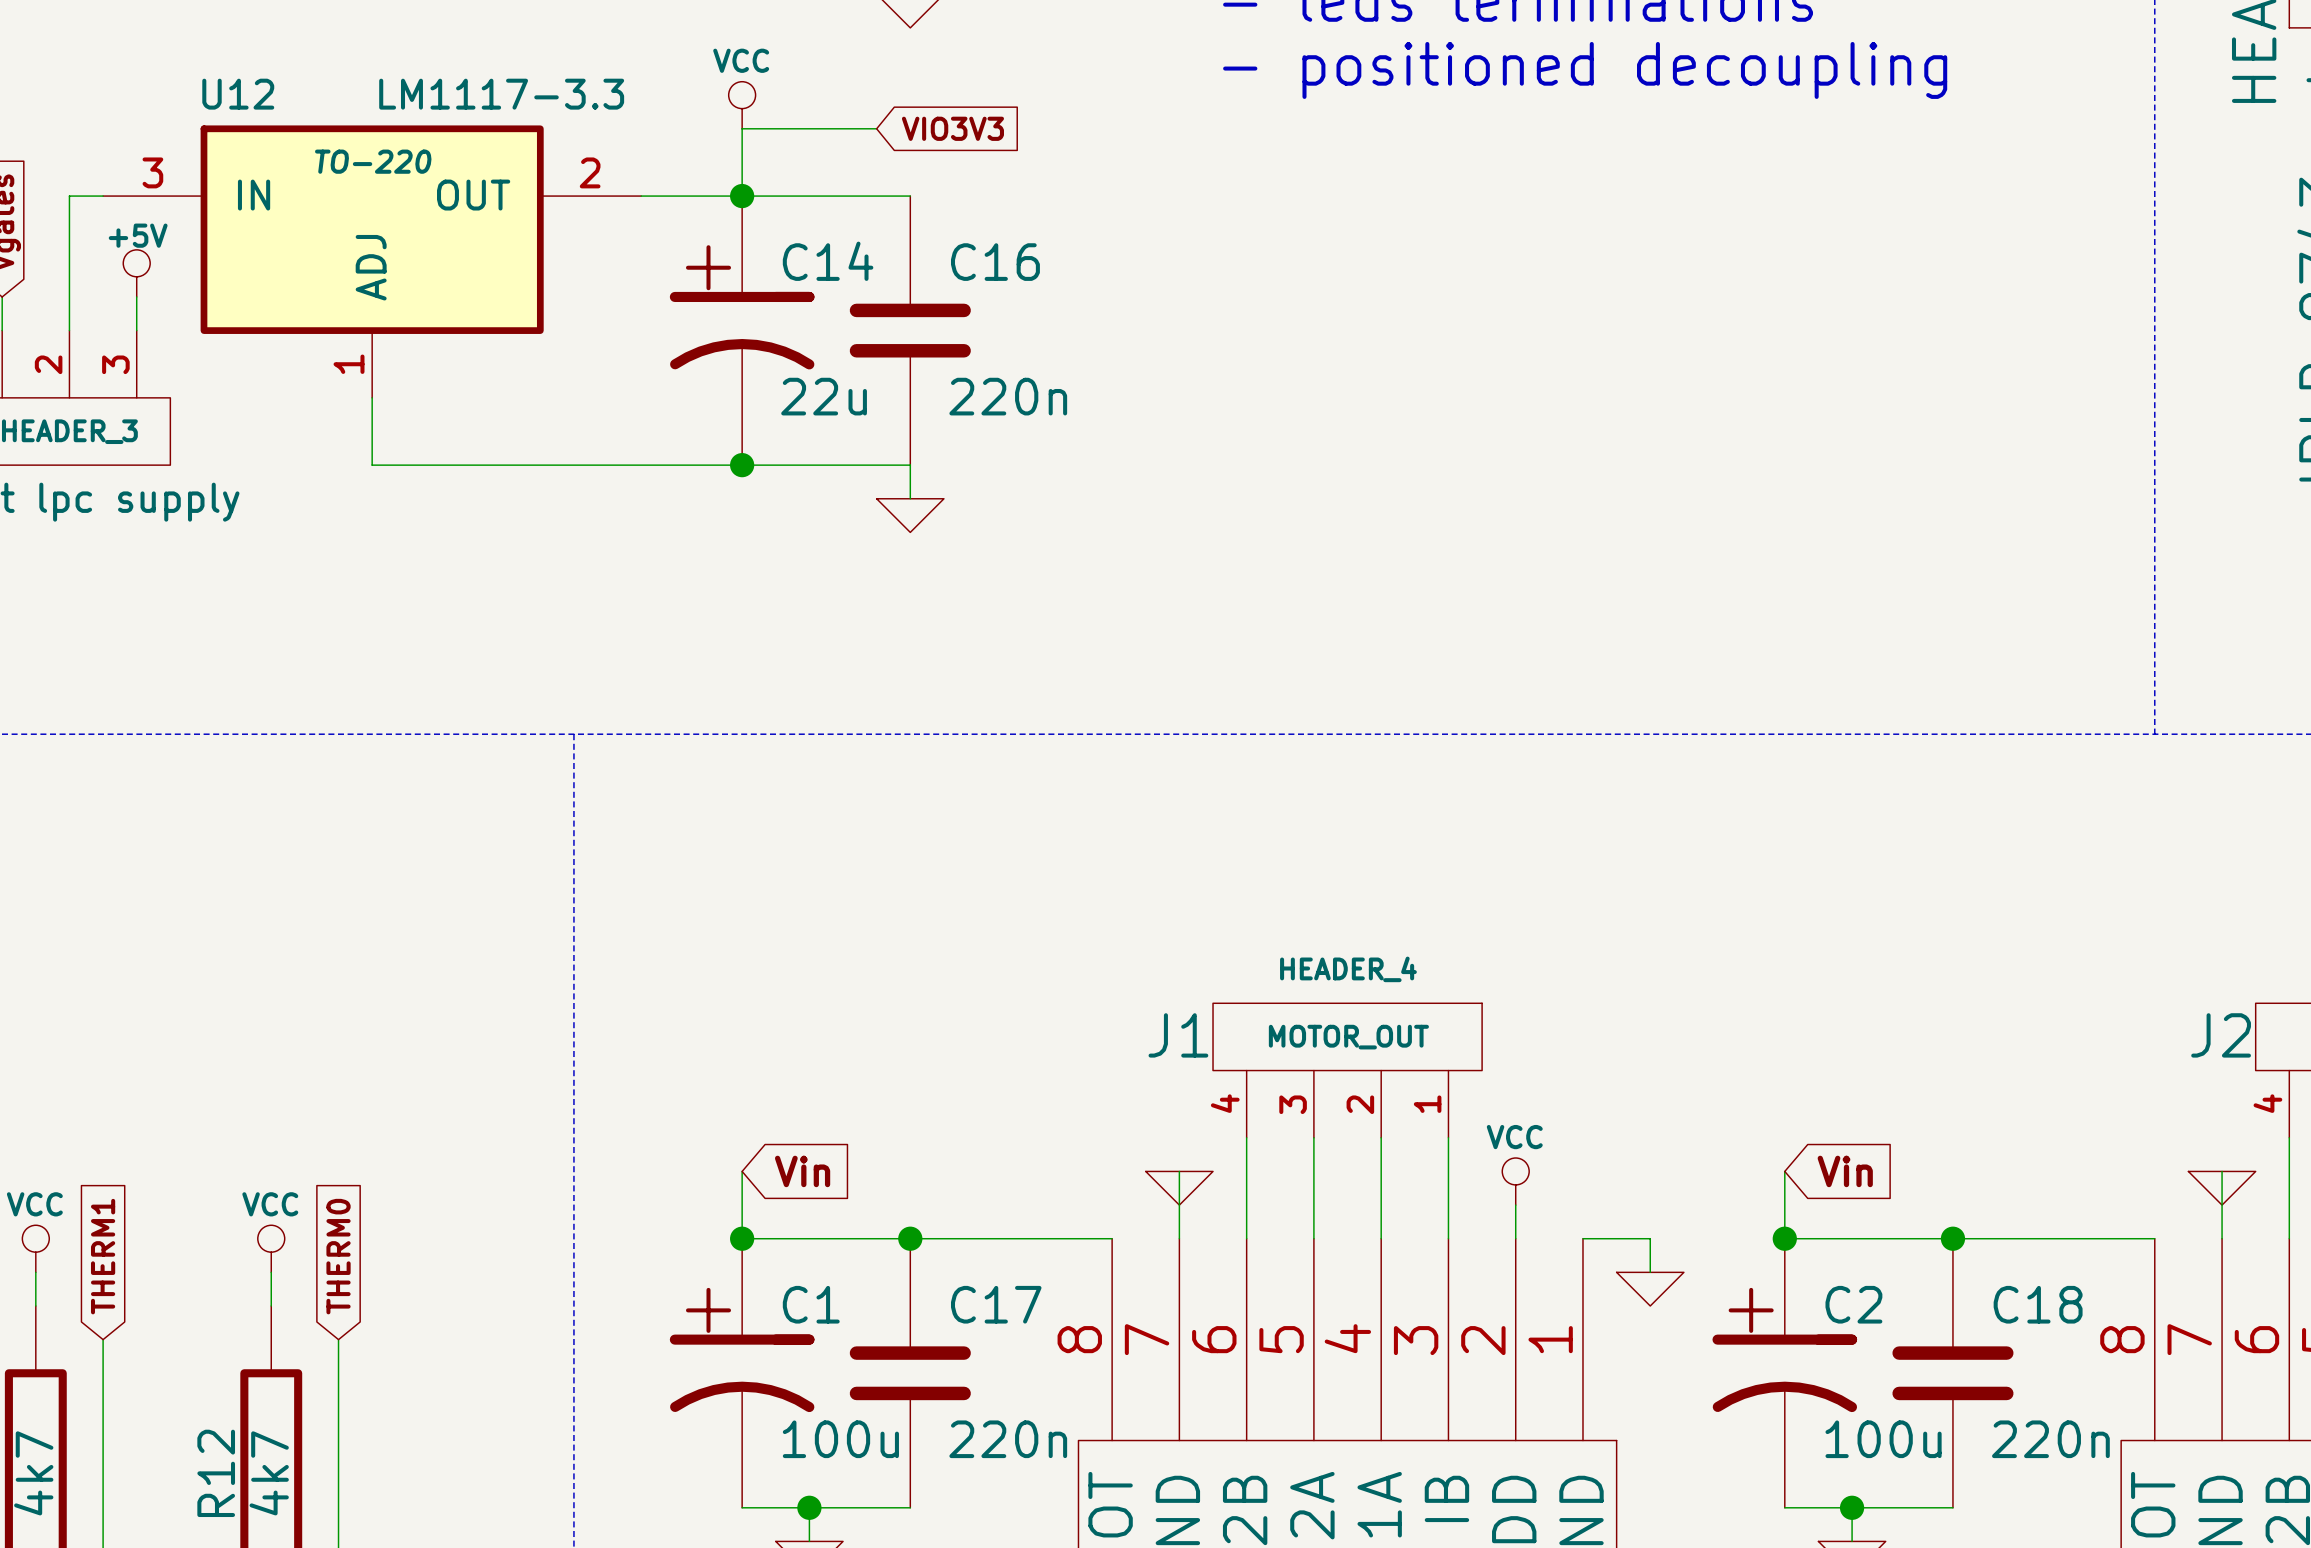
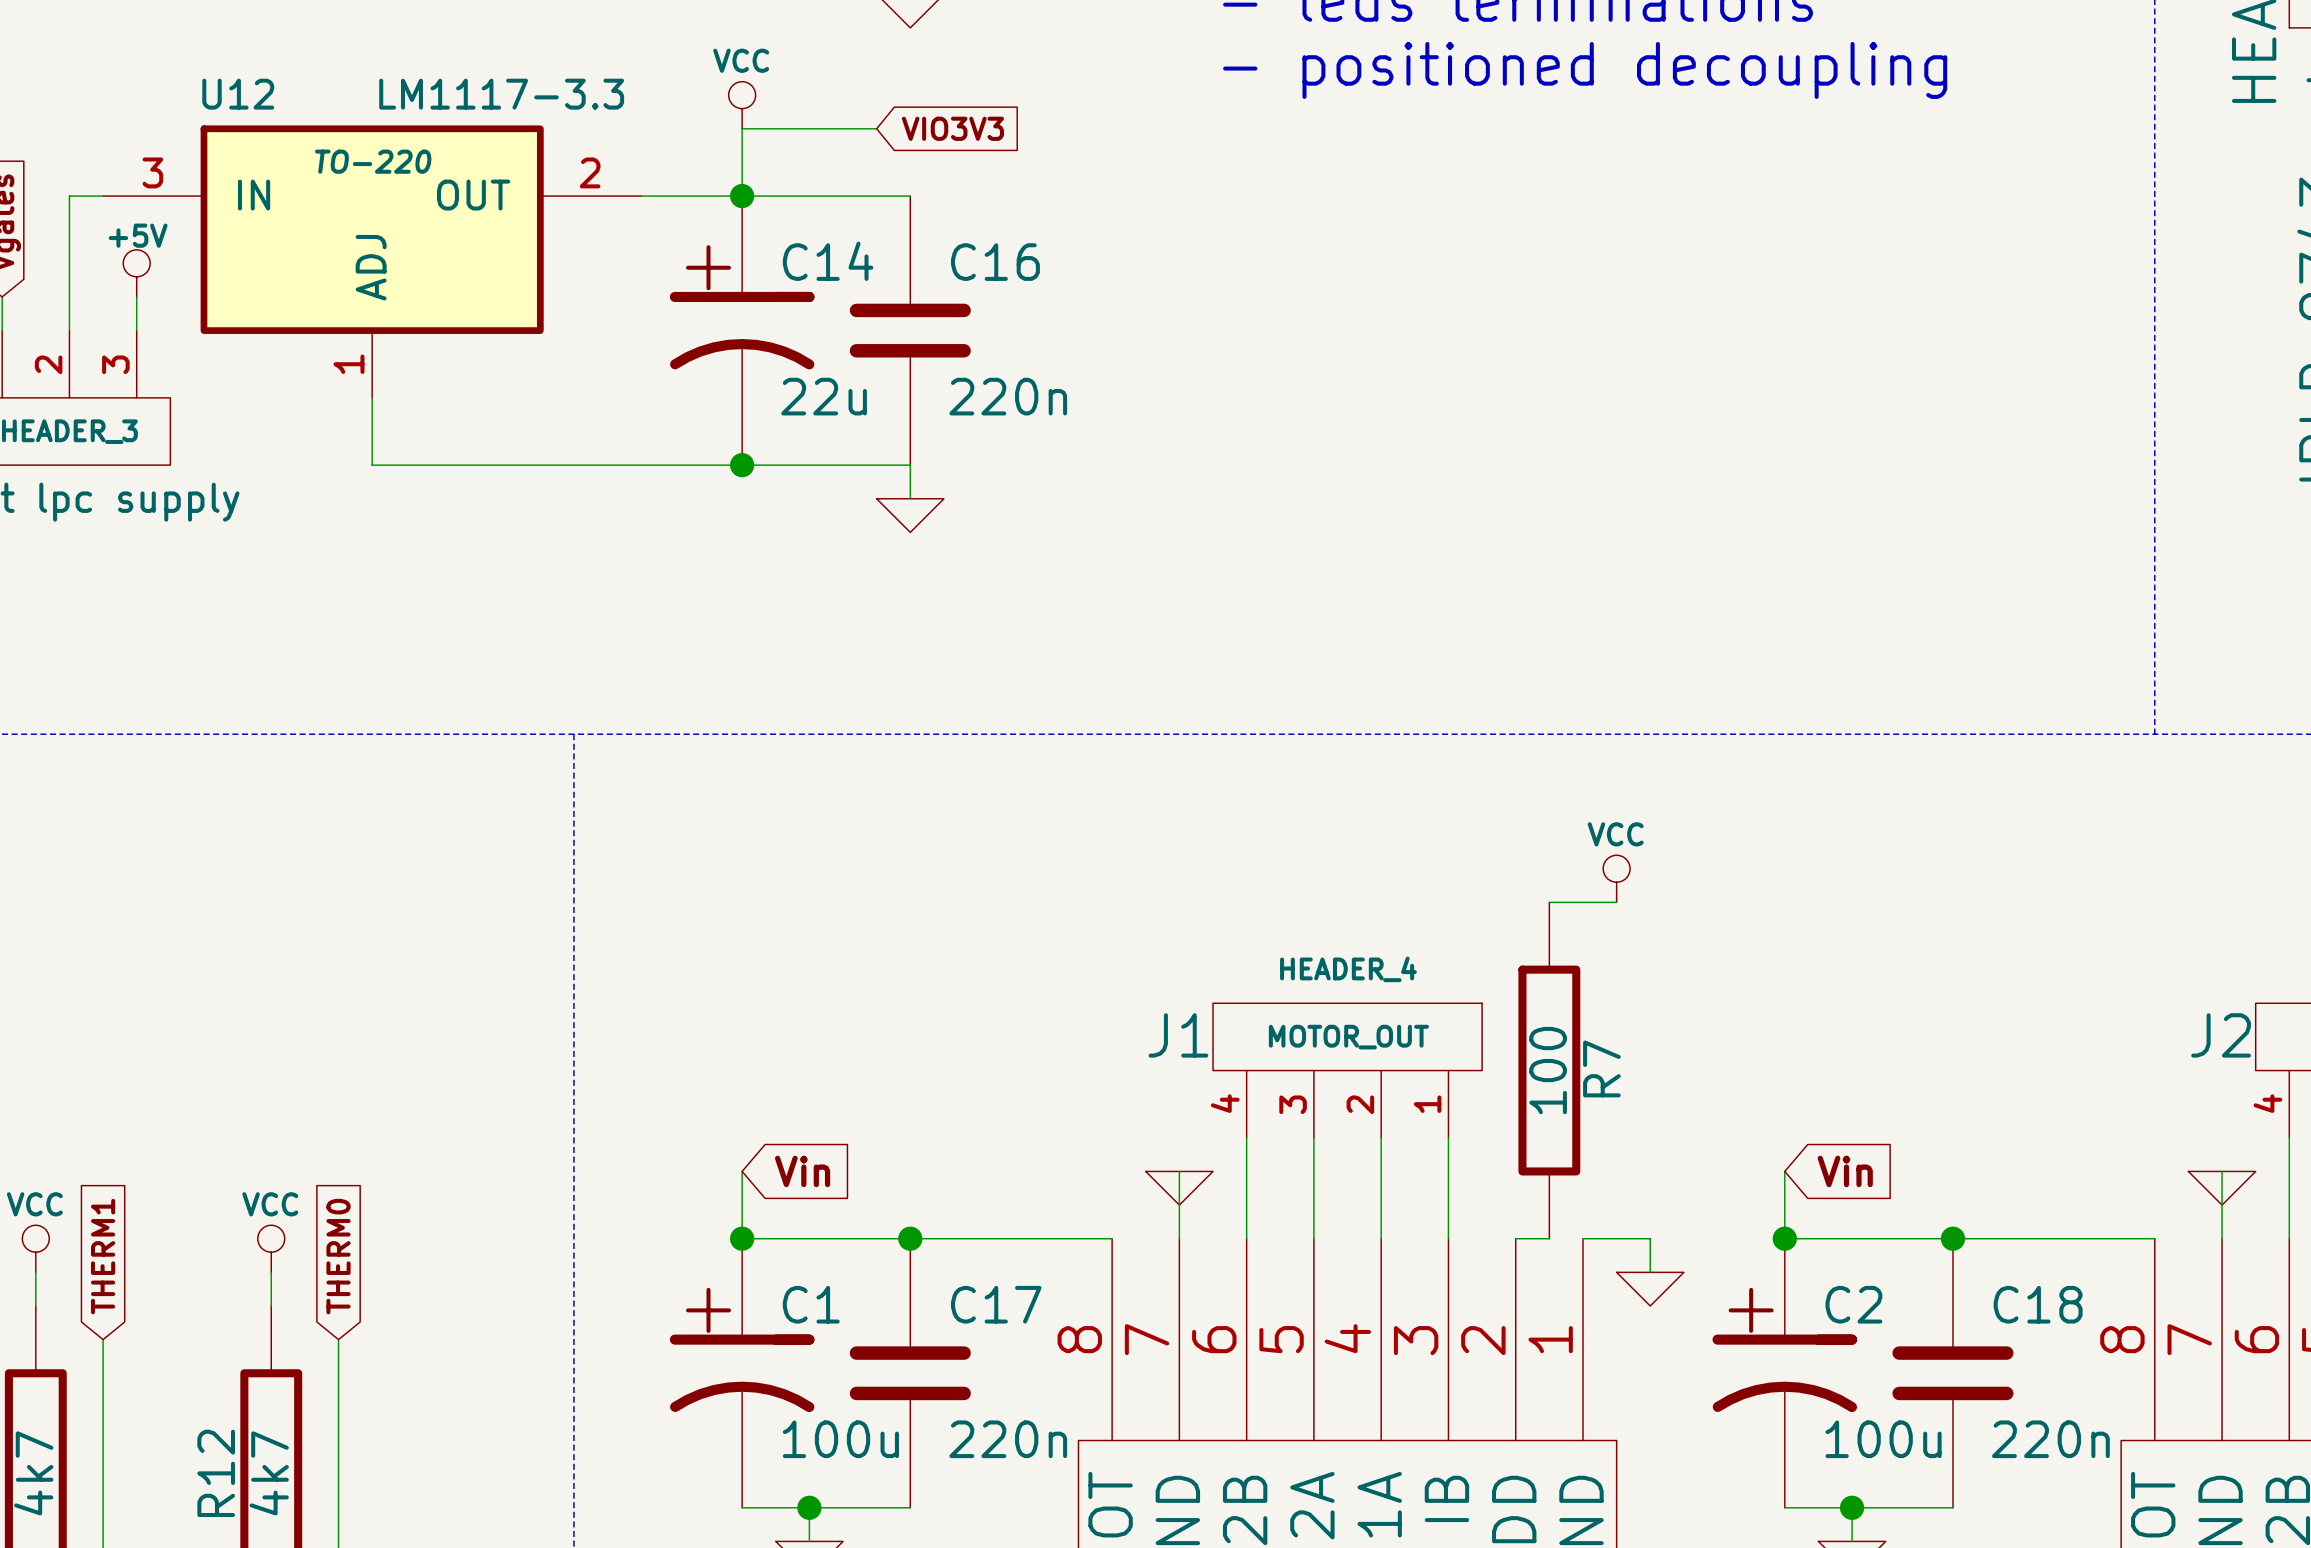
wire: none -> (1549, 902) (1616, 902)
R7: none -> 100 (1549, 1070)
power symbol position: VCC (1515, 1181) -> VCC (1616, 878)
wire: (1515, 1205) (1515, 1238) -> (1549, 1238) (1515, 1238)

